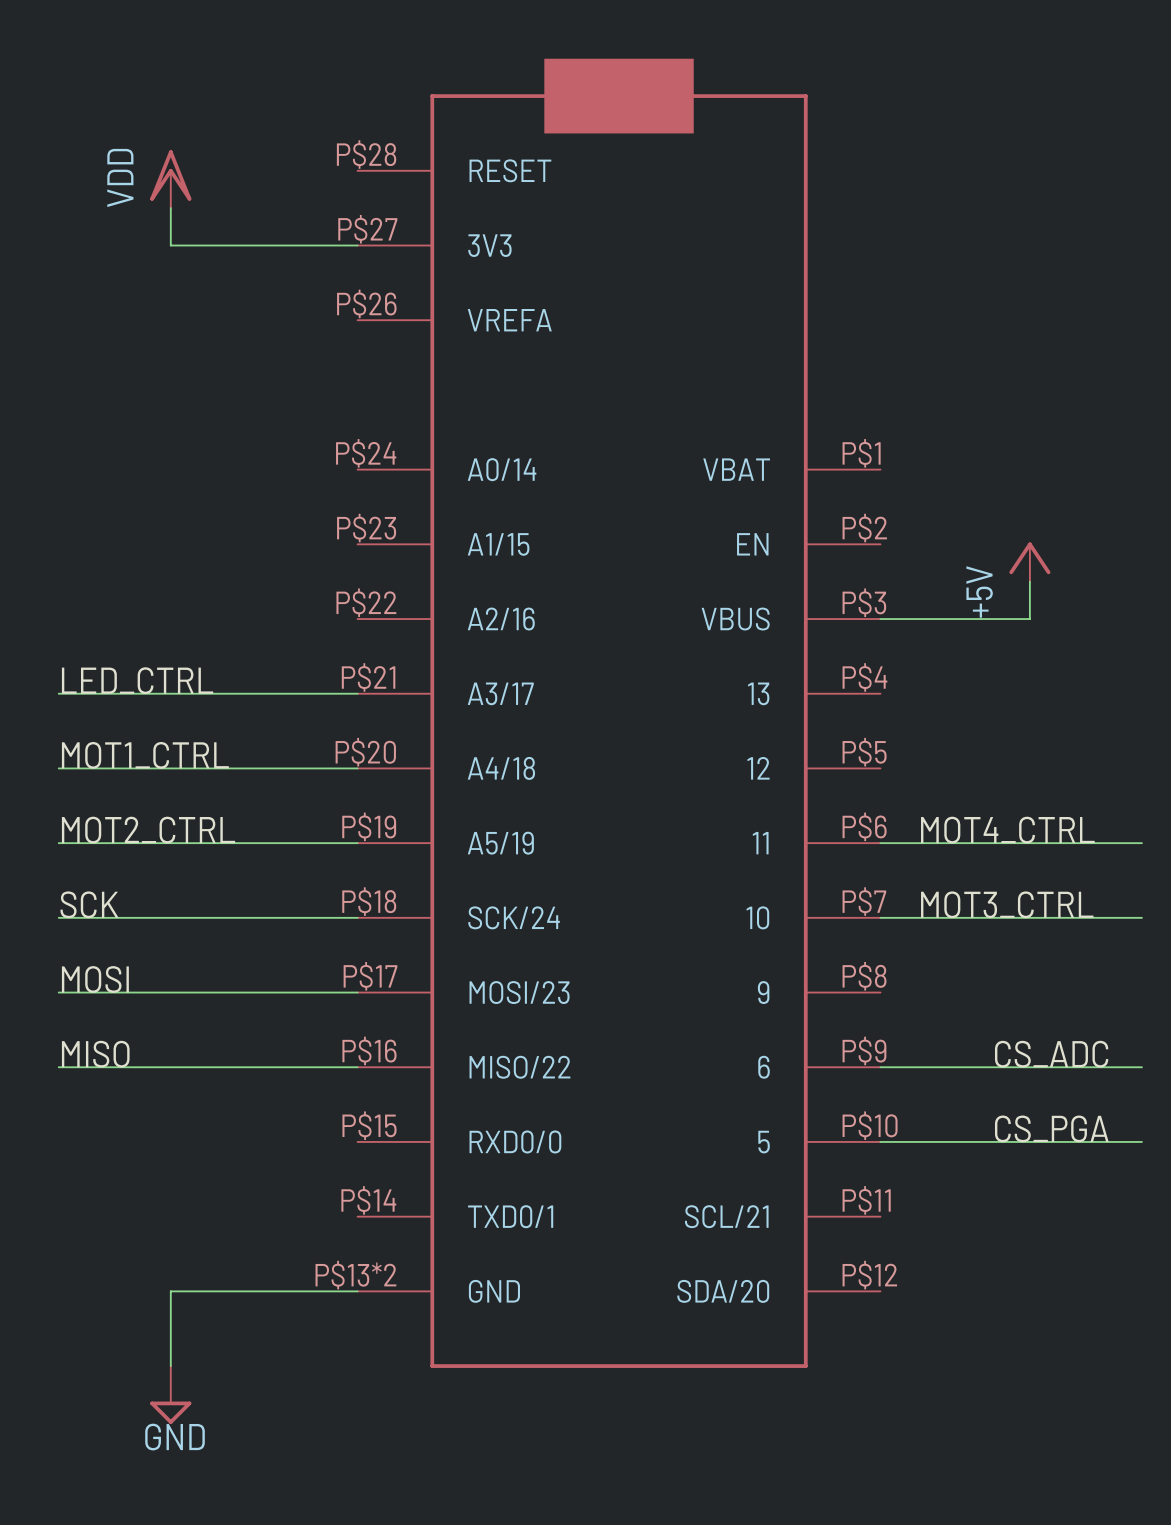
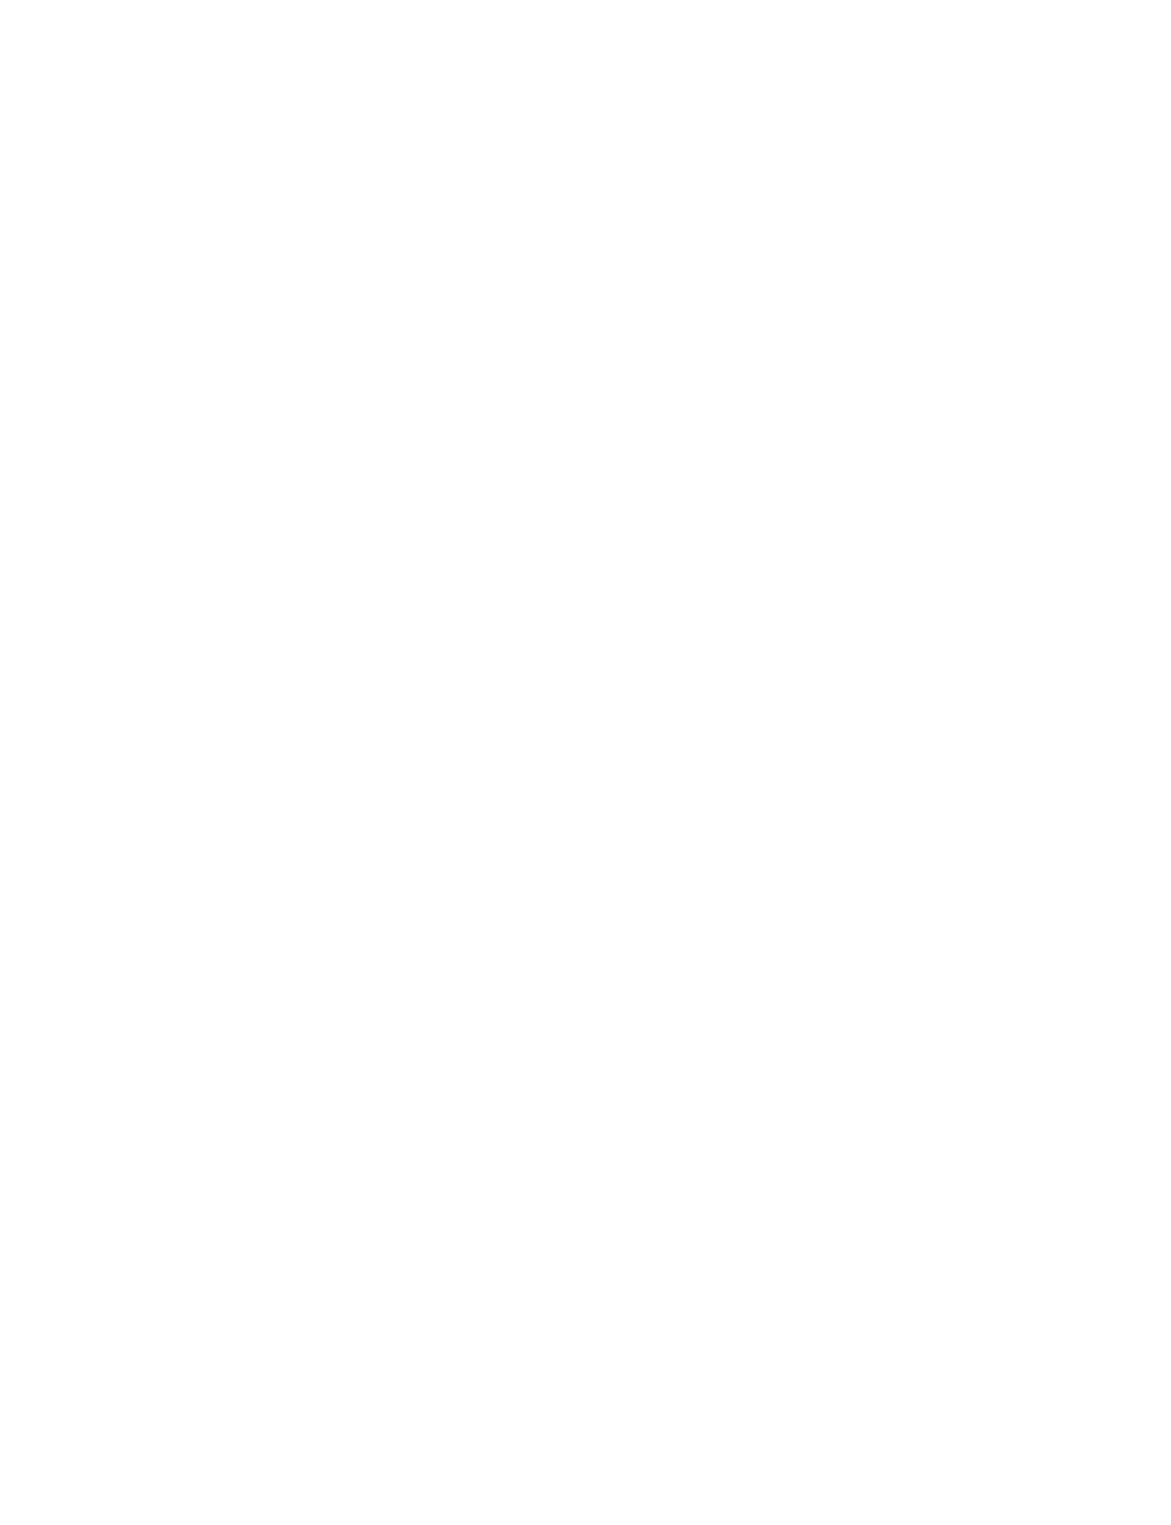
power symbol: VDD (170, 179) -> none
wire: (170, 208) (170, 245) (357, 245) -> none
power symbol: +5V (1029, 562) -> none
wire: (1029, 581) (1029, 619) (880, 619) -> none
label: LED_CTRL (137, 680) -> none
wire: (58, 693) (357, 693) -> none
part: (619, 713) -> none
label: MOT1_CTRL (145, 755) -> none
wire: (58, 768) (357, 768) -> none
label: MOT2_CTRL (148, 830) -> none
label: MOT4_CTRL (1007, 830) -> none
wire: (58, 843) (357, 843) -> none
wire: (880, 843) (1141, 843) -> none
label: SCK (89, 904) -> none
label: MOT3_CTRL (1007, 904) -> none
wire: (58, 917) (357, 917) -> none
wire: (880, 917) (1141, 917) -> none
label: MOSI (95, 979) -> none
wire: (58, 992) (357, 992) -> none
label: MISO (95, 1054) -> none
label: CS_ADC (1051, 1054) -> none
wire: (58, 1067) (357, 1067) -> none
wire: (880, 1067) (1141, 1067) -> none
label: CS_PGA (1051, 1128) -> none
wire: (880, 1141) (1141, 1141) -> none
wire: (357, 1291) (170, 1291) (170, 1366) -> none
power symbol: GND (170, 1395) -> none

